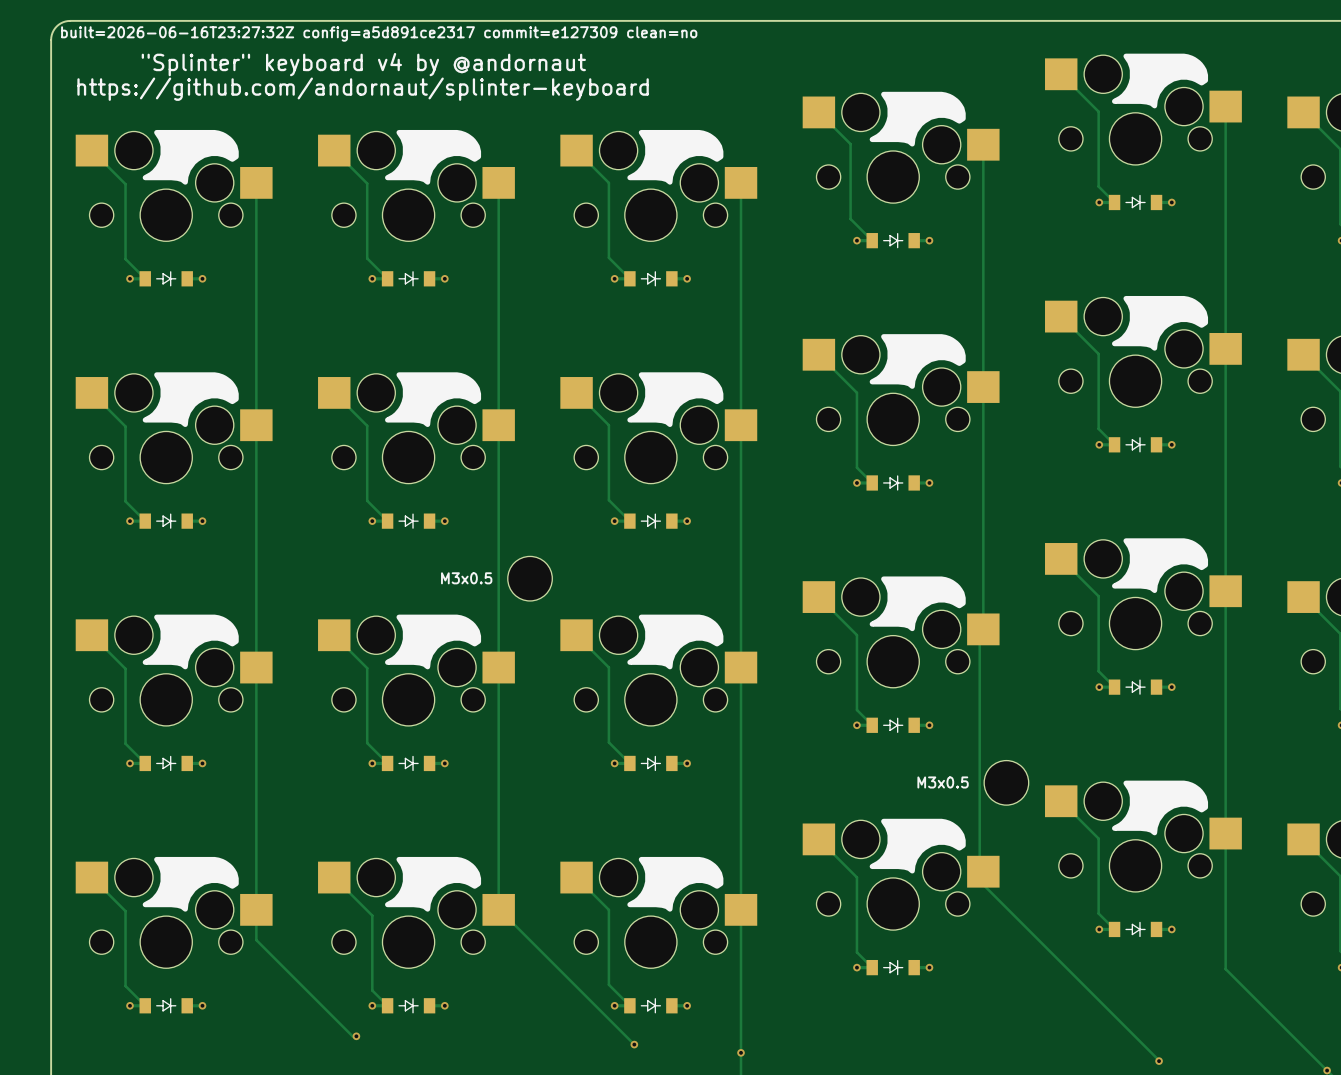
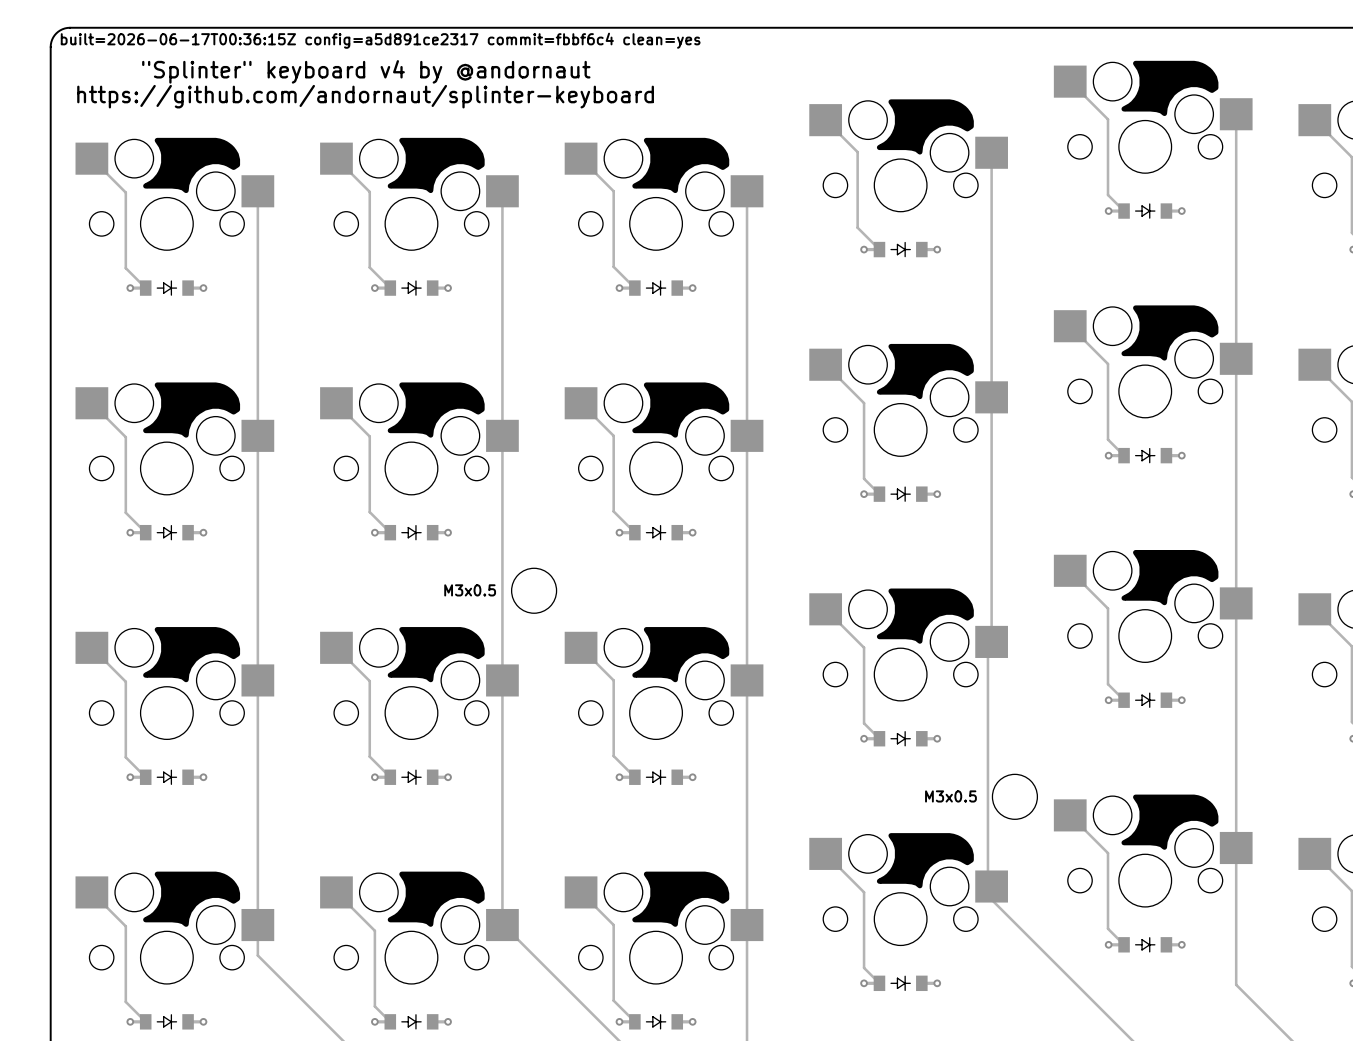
text: built=2026-06-16T23:27:32Z config=a5d891ce2317 commit=e127309 clean=no (379, 33) -> built=2026-06-17T00:36:15Z config=a5d891ce2317 commit=fbbf6c4 clean=yes (380, 40)

